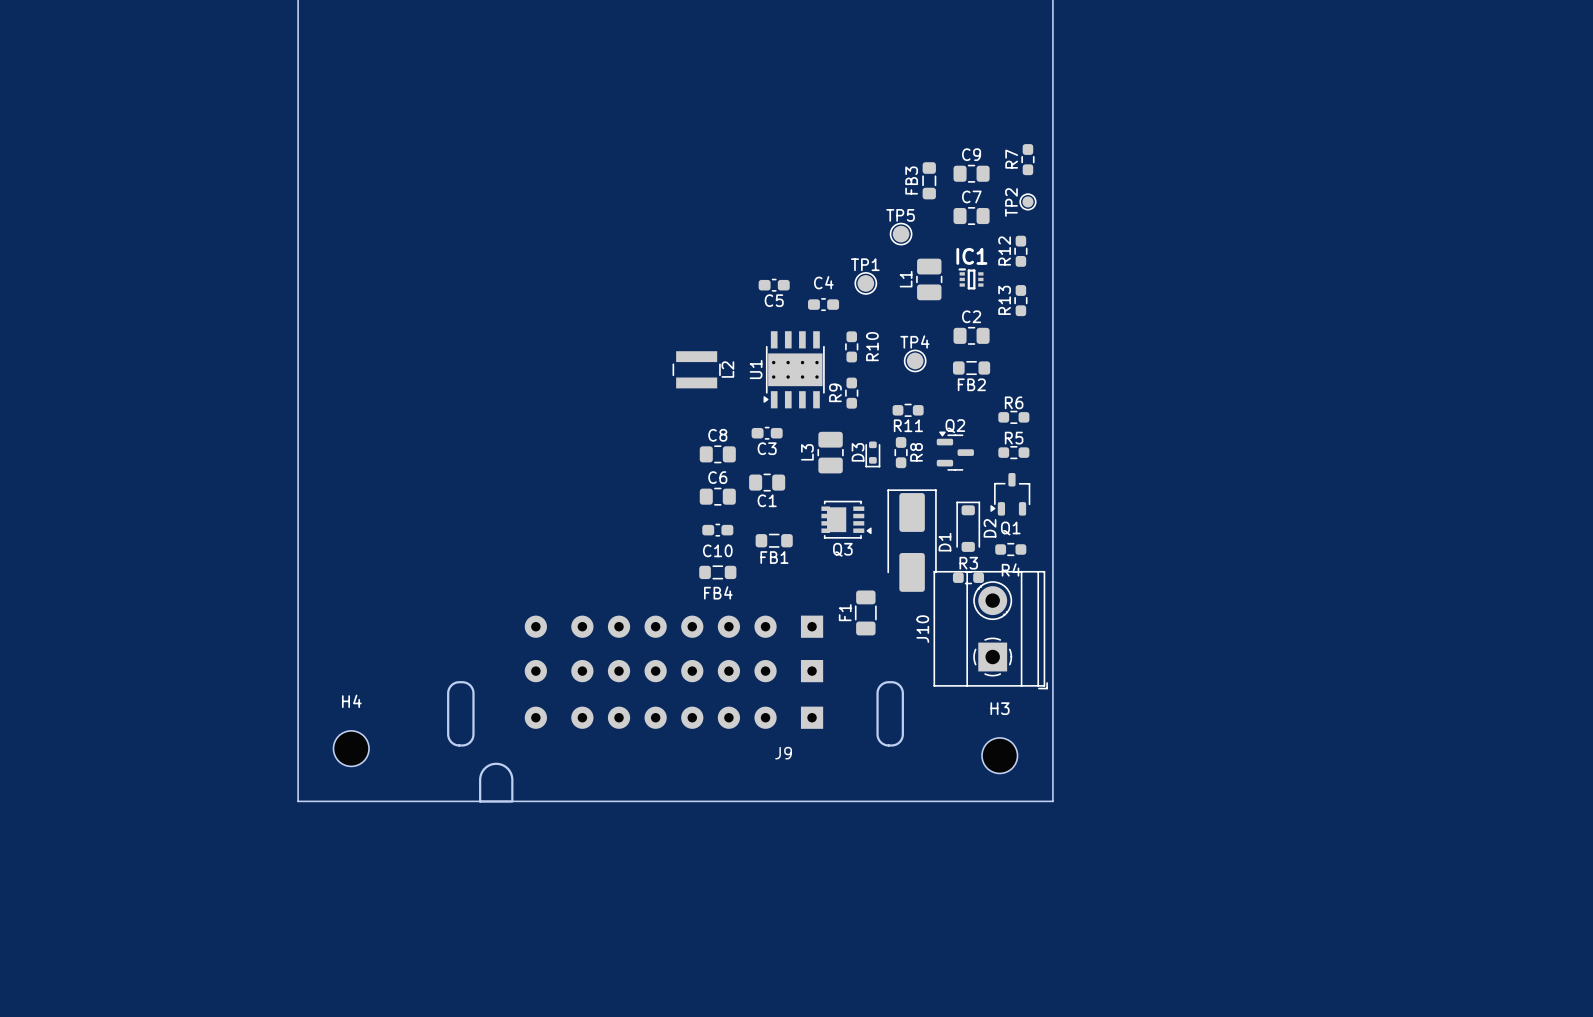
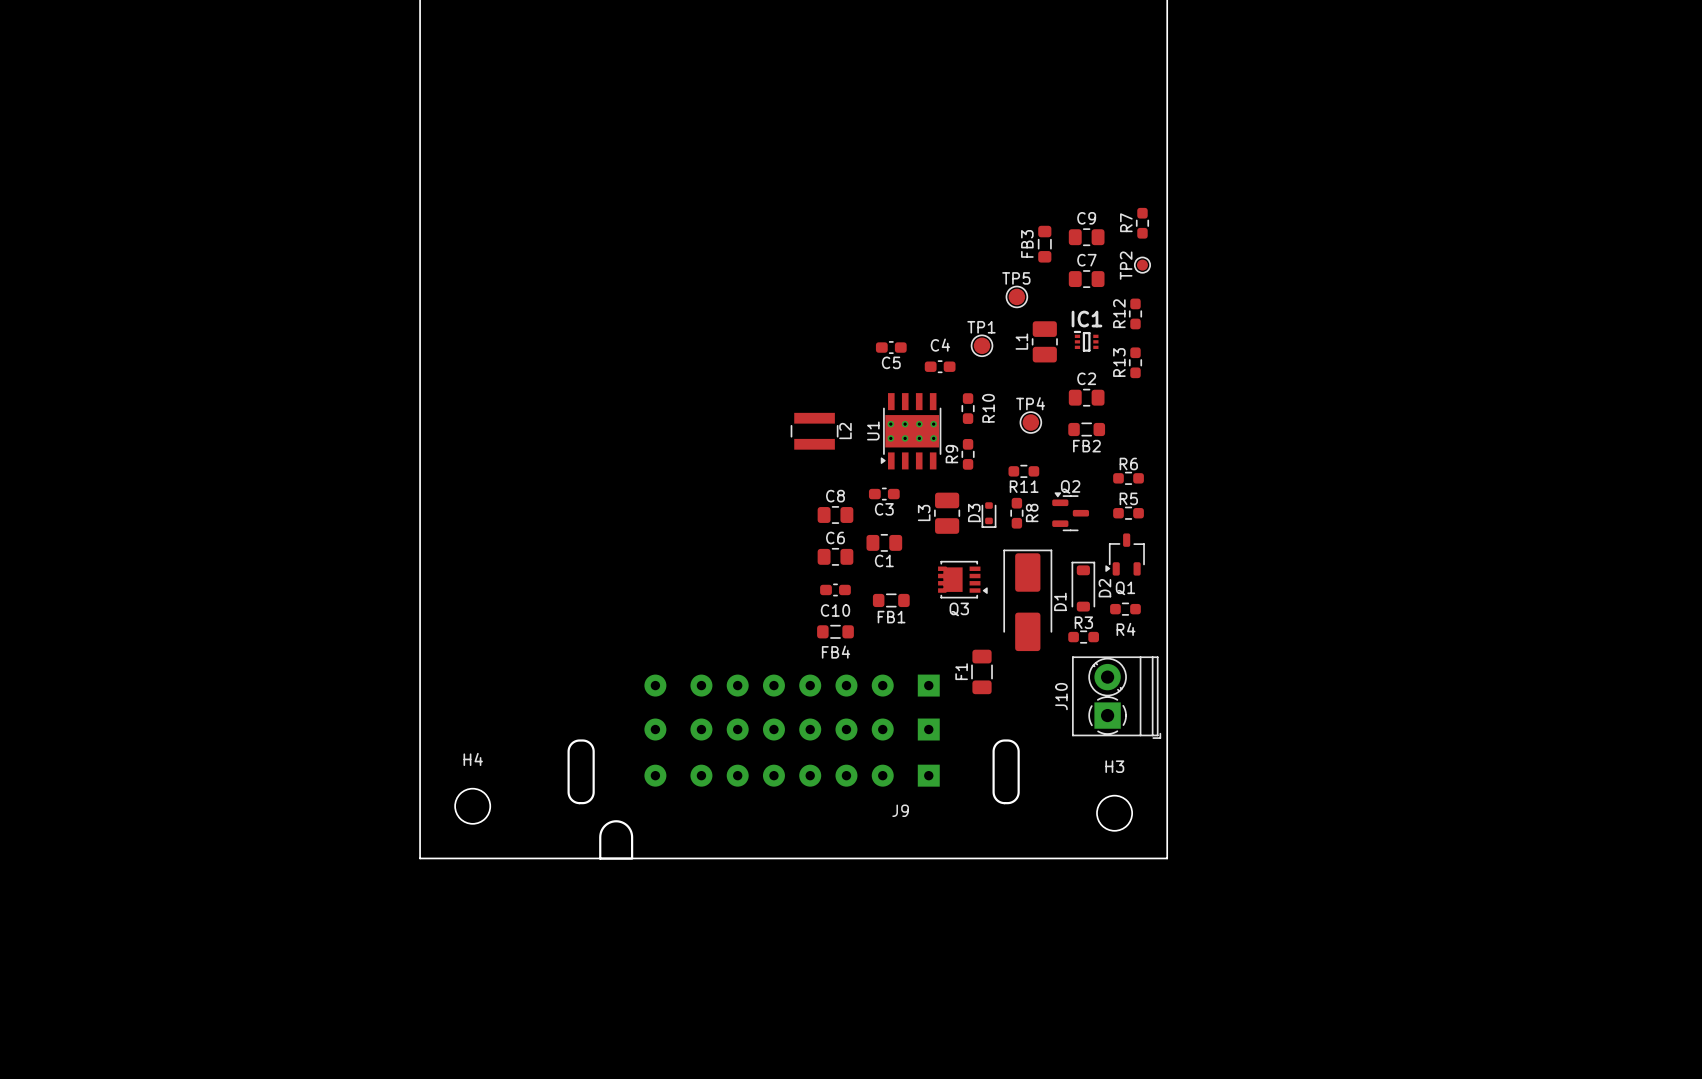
J10 footprint: [933, 571, 1048, 690] -> [1072, 656, 1161, 739]

